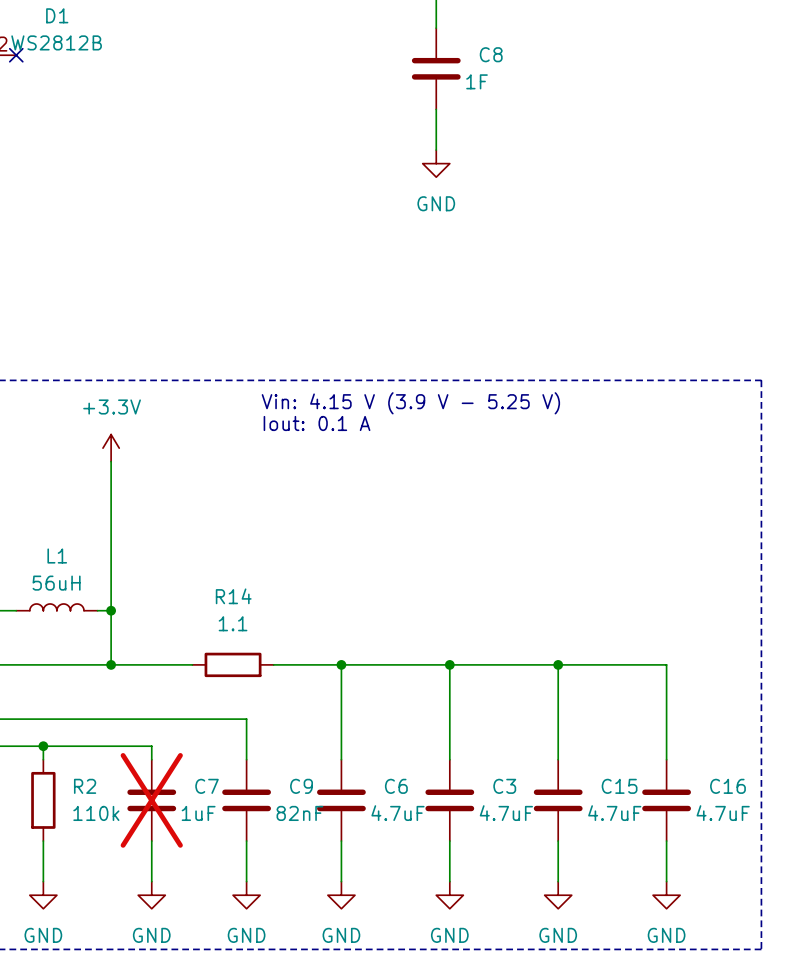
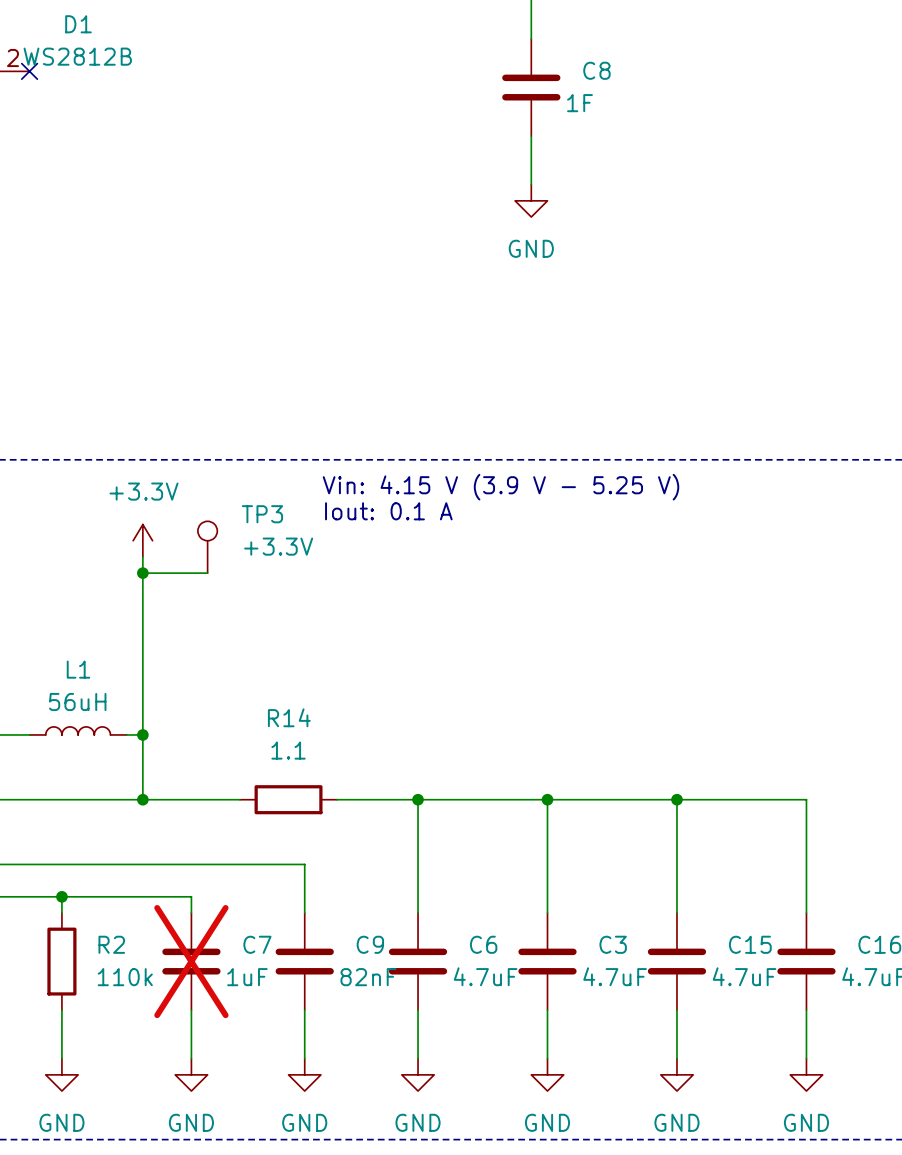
TP3: none -> +3.3V (207, 547)
wire: none -> (142, 573) (207, 573)
junction: none -> (142, 573)

